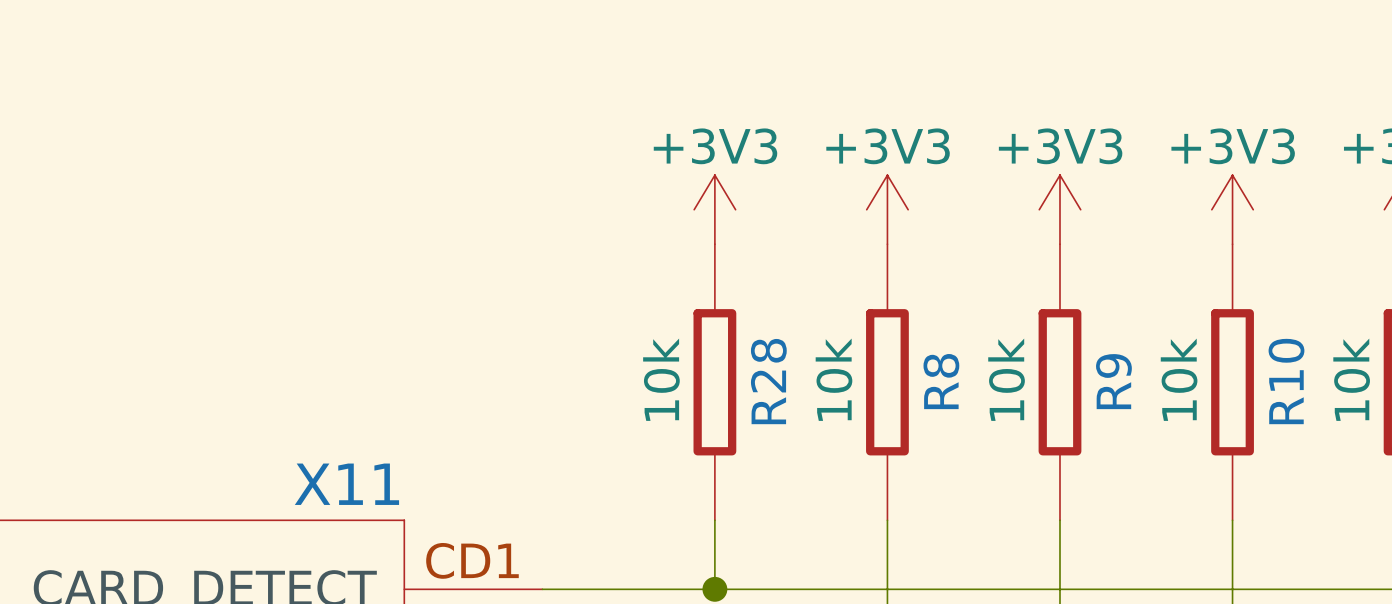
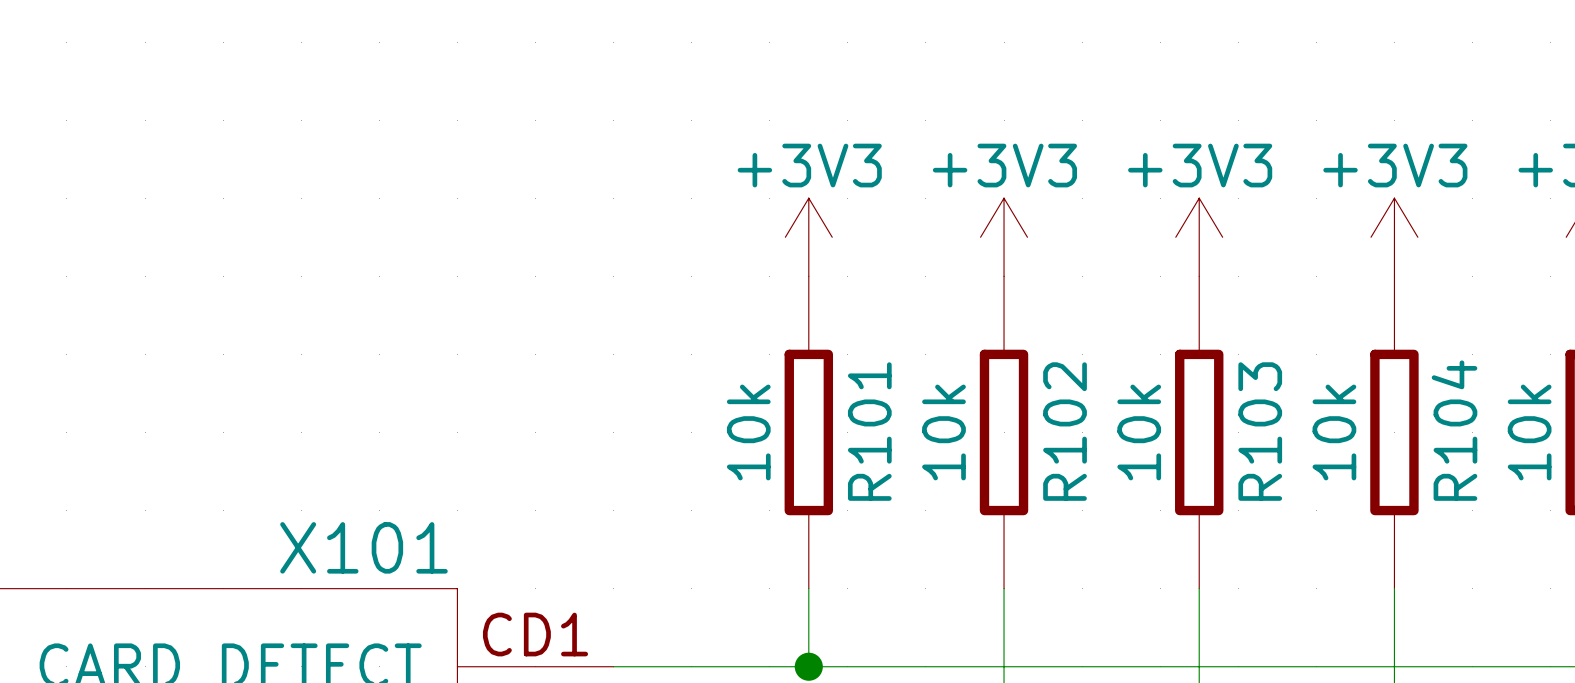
R28 name: R28 (768, 381) -> R101 (869, 431)
R8 name: R8 (941, 381) -> R102 (1065, 431)
R9 name: R9 (1113, 381) -> R103 (1260, 431)
R10 name: R10 (1286, 381) -> R104 (1454, 430)
X11 name: X11 (346, 484) -> X101 (363, 547)

